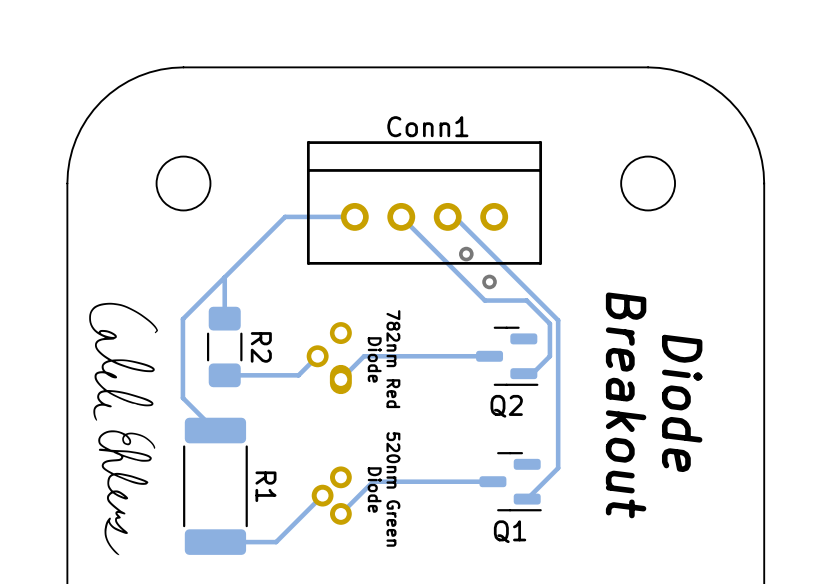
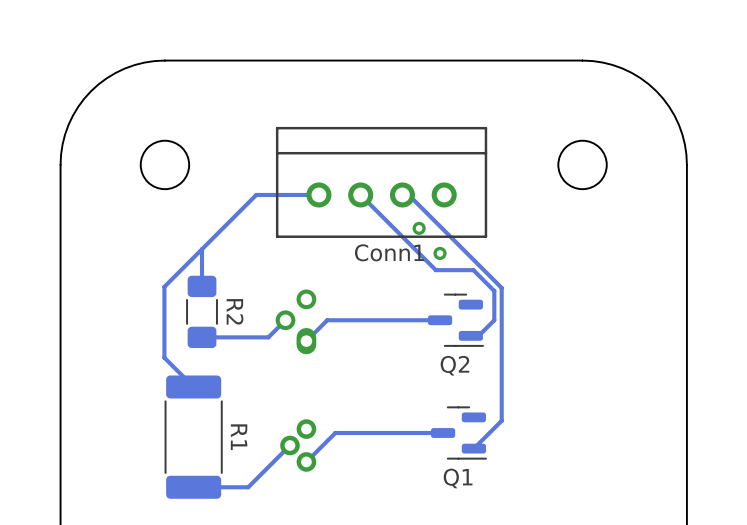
Conn1 name position: Conn1 (427, 126) -> Conn1 (389, 252)
drawing: [89, 302, 158, 556] -> none
text: Diode (374, 359) -> none
text: 782nm Red (393, 359) -> none
text: Diode (682, 403) -> none
text: Breakout (626, 405) -> none
text: 520nm Green (393, 489) -> none
text: Diode (374, 490) -> none

